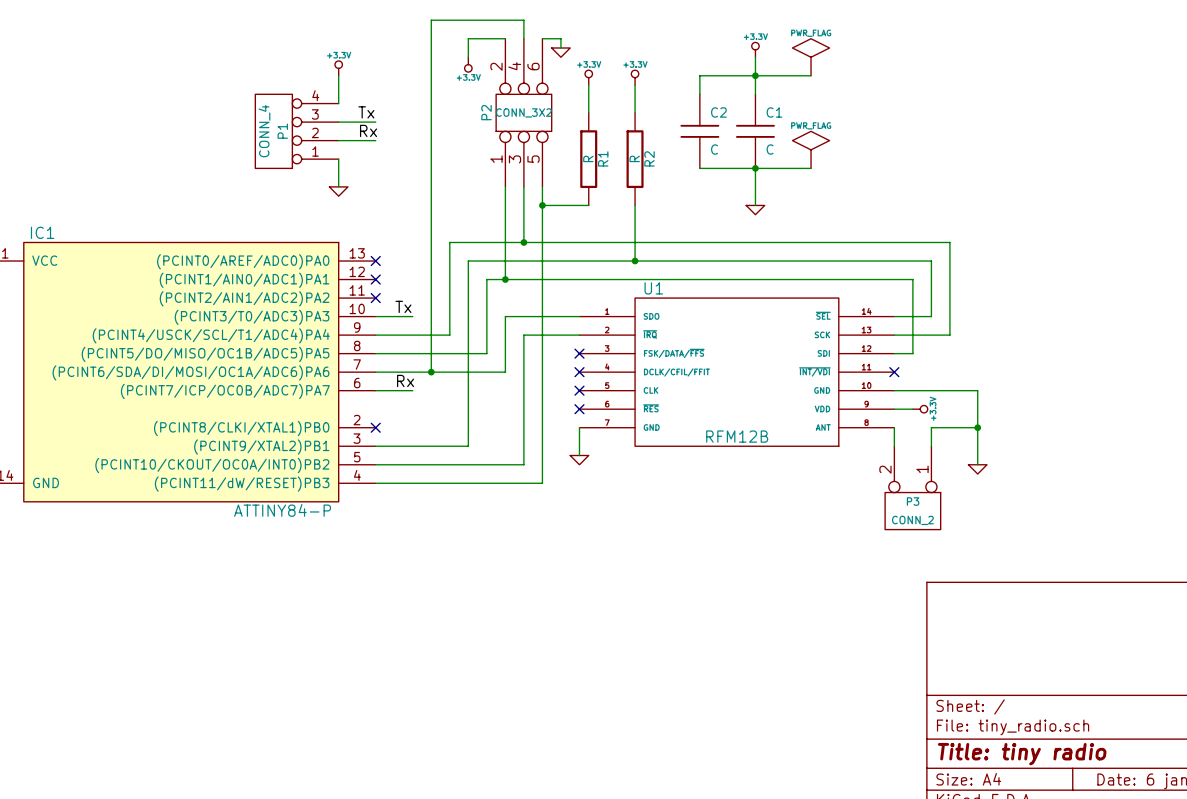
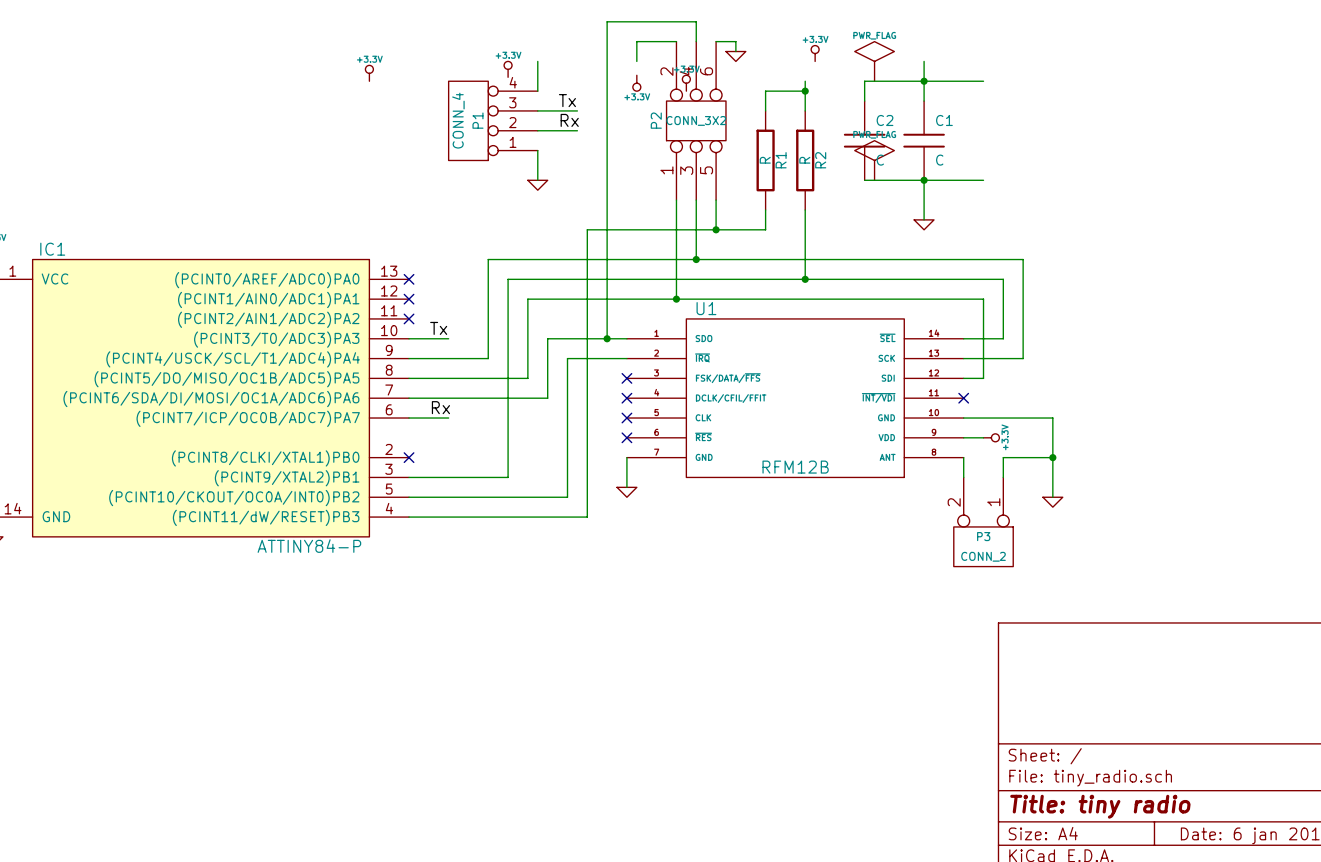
wire: (505, 38) (468, 38) (468, 57) -> (676, 41) (636, 41) (636, 61)
wire: (523, 38) (523, 20) (431, 20) (431, 372) -> none
wire: (542, 38) (560, 38) -> (696, 41) (696, 21) (607, 21) (607, 41)
wire: none -> (716, 41) (735, 41) (735, 51)
wire: none -> (607, 51) (607, 338)
power symbol: (560, 52) -> none
power symbol: none -> (735, 56)
wire: (755, 57) (755, 94) -> (924, 61) (924, 101)
power symbol rotation: 0° (468, 64) -> 180° (508, 69)
wire: (338, 75) (338, 103) -> (537, 61) (537, 91)
junction position: (755, 75) -> (805, 91)
wire: (801, 75) (699, 75) (699, 94) -> (864, 81) (864, 101)
wire: none -> (874, 81) (983, 81)
junction: none -> (924, 81)
power symbol rotation: 0° (588, 77) -> 180° (636, 83)
wire: (588, 85) (588, 112) -> (805, 81) (805, 110)
wire: (635, 85) (635, 112) -> (716, 200) (716, 229)
wire: none -> (805, 91) (765, 91) (765, 110)
label position: Tx (366, 112) -> Tx (567, 100)
P2 position: (523, 112) -> (696, 120)
wire: (338, 122) (375, 122) -> (537, 110) (577, 110)
label position: Rx (368, 130) -> Rx (569, 120)
P1 position: (297, 131) -> (493, 120)
C2 position: (699, 131) -> (864, 140)
C1 position: (755, 131) -> (924, 140)
wire: (338, 140) (375, 140) -> (537, 130) (577, 130)
wire: (338, 159) (338, 186) -> (537, 150) (537, 180)
R1 position: (588, 159) -> (765, 160)
R2 position: (635, 159) -> (805, 160)
wire: (699, 168) (801, 168) -> (874, 180) (983, 180)
wire: (755, 168) (755, 205) -> (924, 180) (924, 219)
junction: (755, 168) -> none
junction: none -> (924, 180)
power symbol: none -> (537, 185)
wire: (505, 186) (505, 279) -> (676, 200) (676, 299)
wire: (523, 186) (523, 242) -> (696, 200) (696, 259)
wire: (542, 186) (542, 214) -> (765, 210) (765, 229) (587, 229)
power symbol: (338, 191) -> none
wire: none -> (805, 210) (805, 279)
wire: (542, 205) (588, 205) -> none
junction: (542, 205) -> none
wire: (635, 205) (635, 261) -> none
power symbol: (755, 210) -> none
power symbol: none -> (924, 224)
junction: none -> (716, 229)
junction: (523, 242) -> none
junction: none -> (696, 259)
junction: (635, 261) -> none
junction: none -> (805, 279)
junction: (505, 279) -> none
junction: none -> (676, 299)
junction: none -> (607, 338)
junction: (431, 372) -> none

